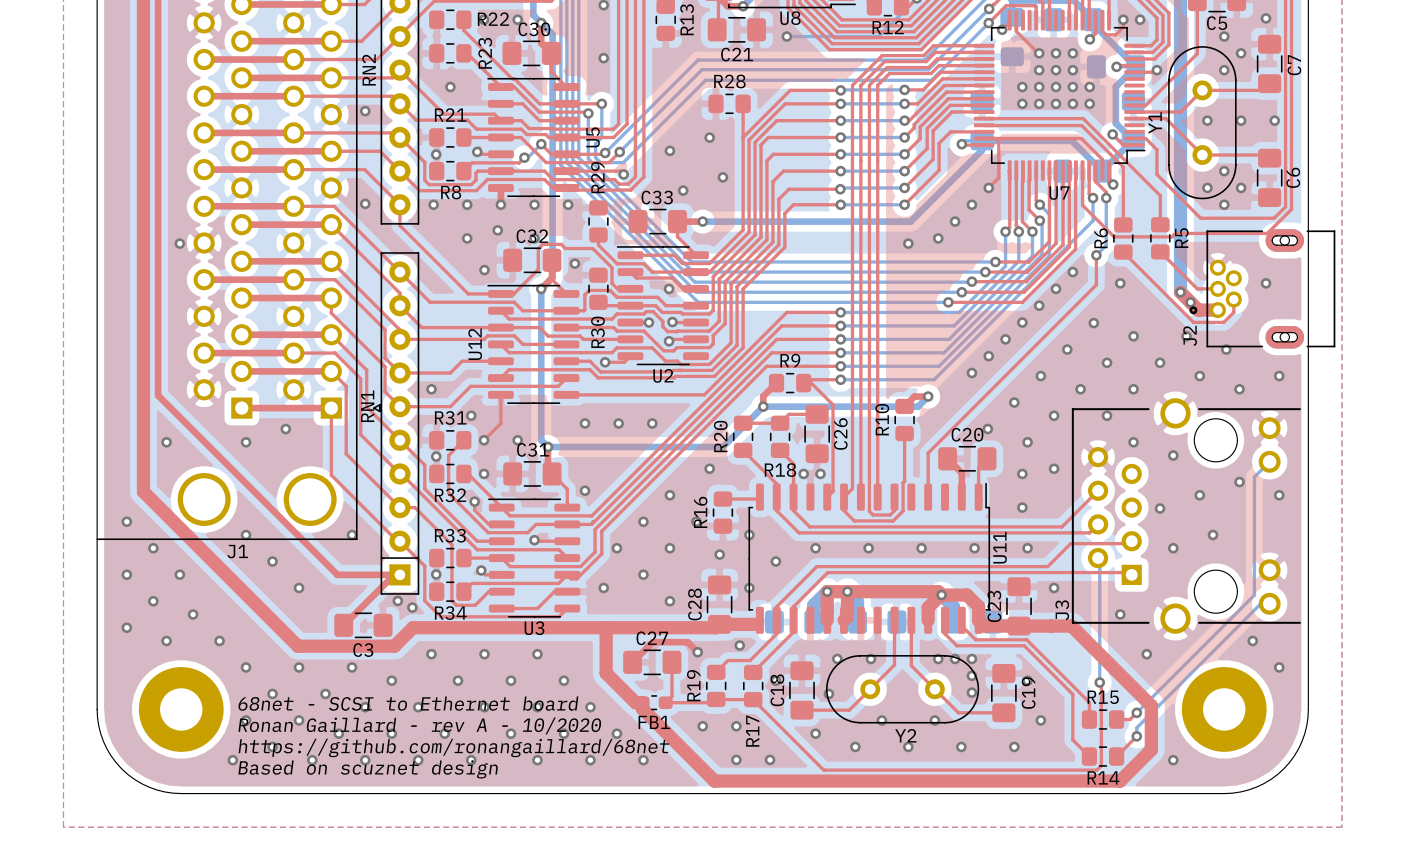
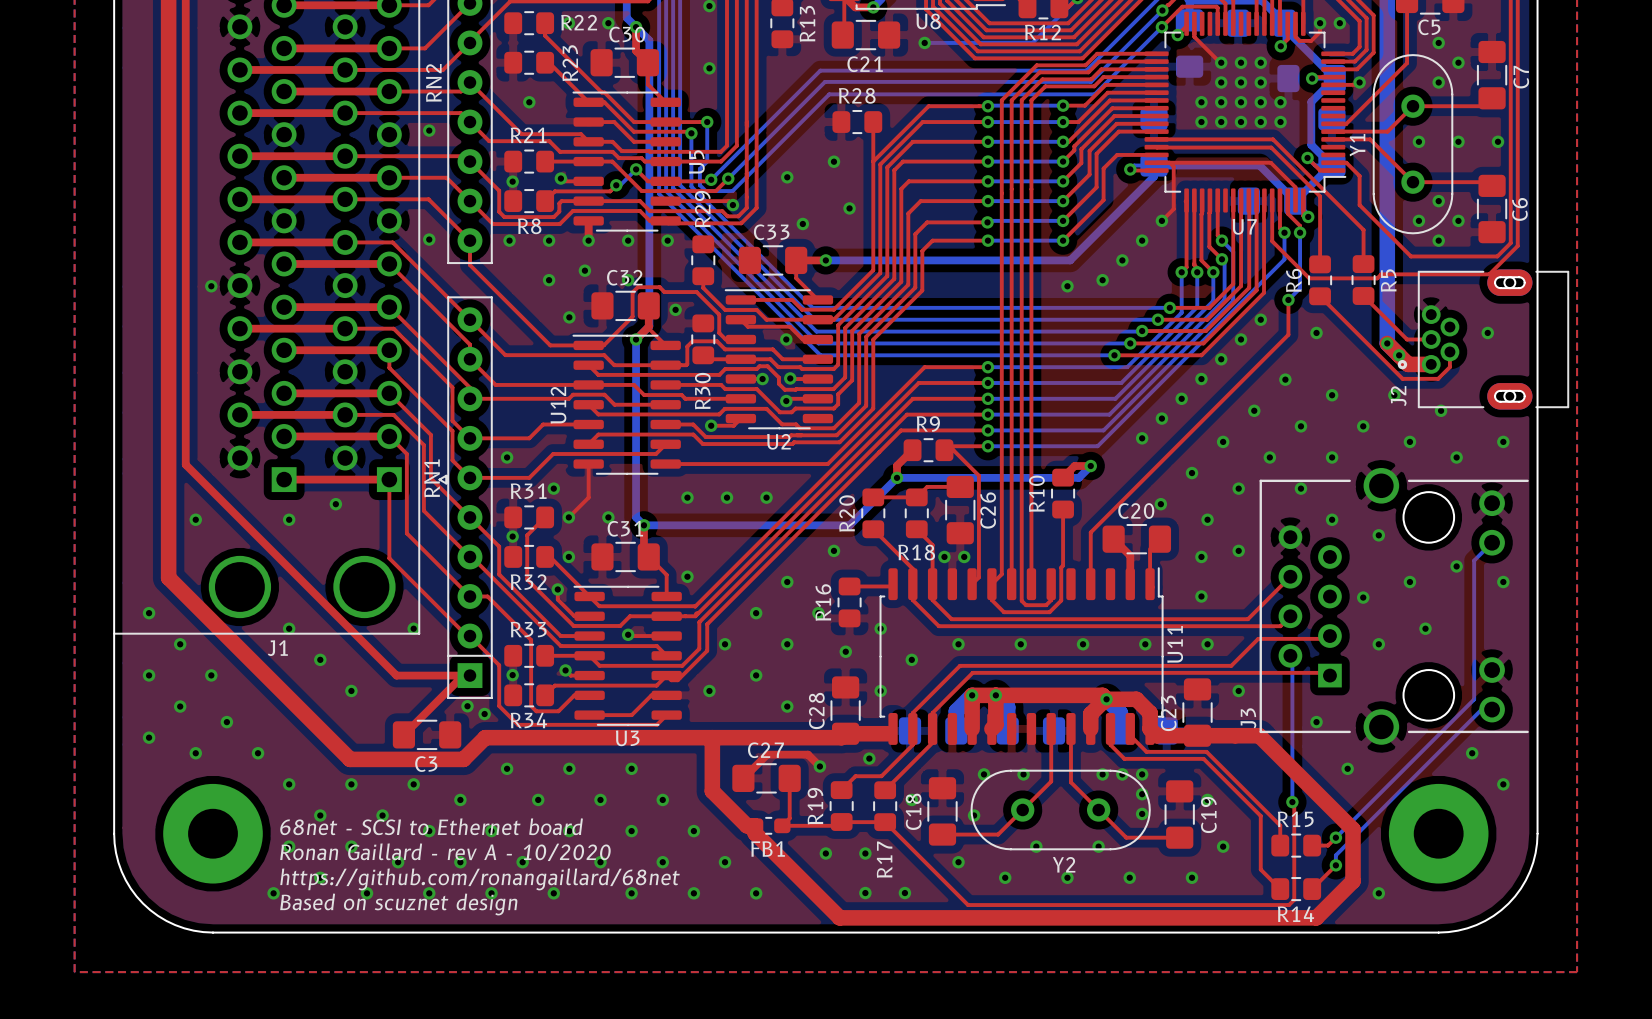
via: (1266, 18) -> none

